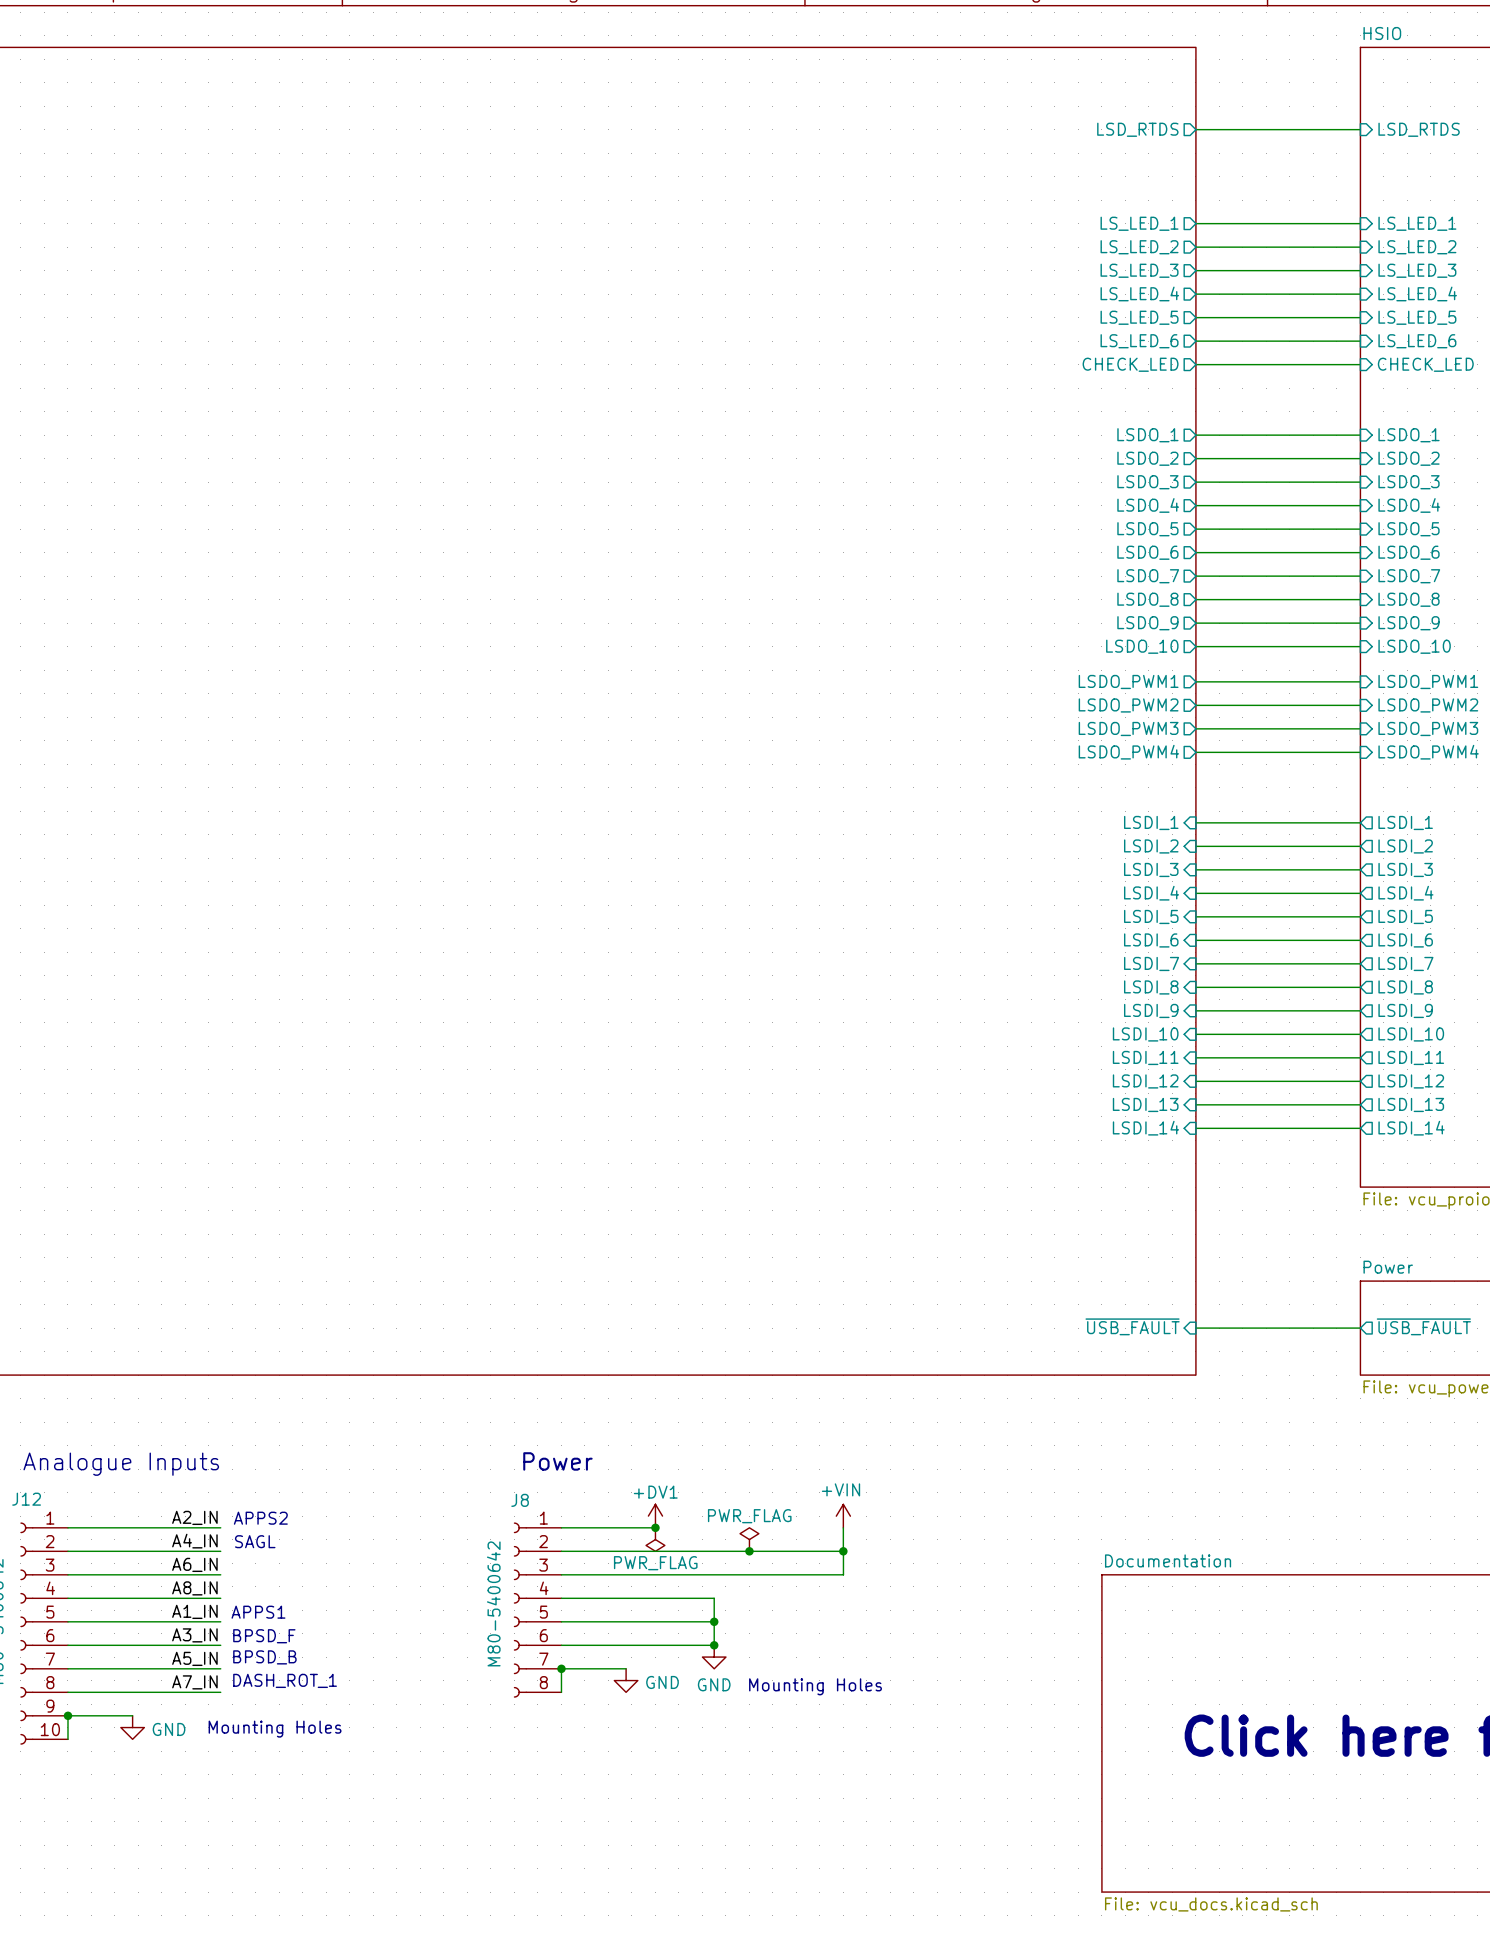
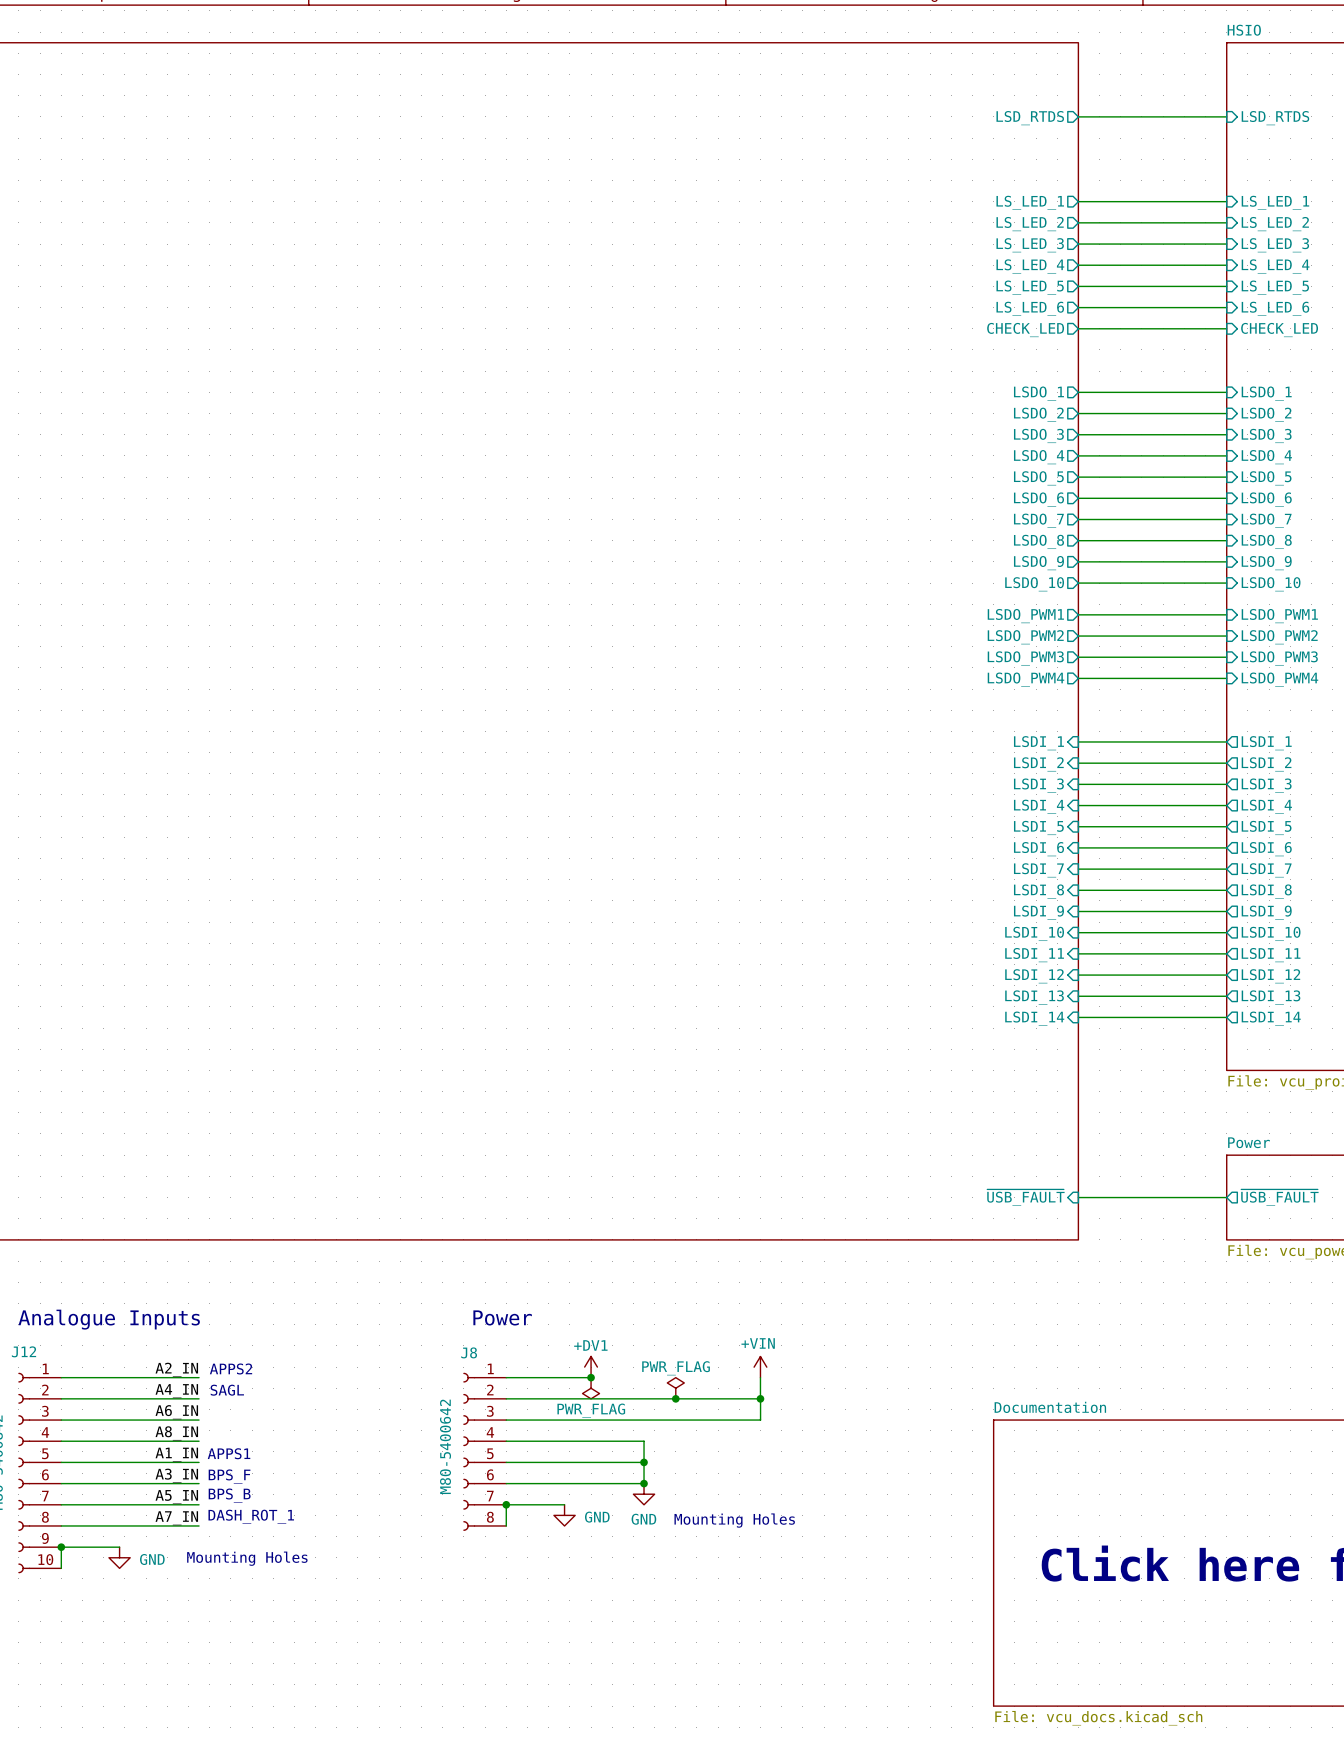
text: BPSD_F (264, 1636) -> BPS_F (229, 1476)
text: BPSD_B (264, 1657) -> BPS_B (229, 1495)

